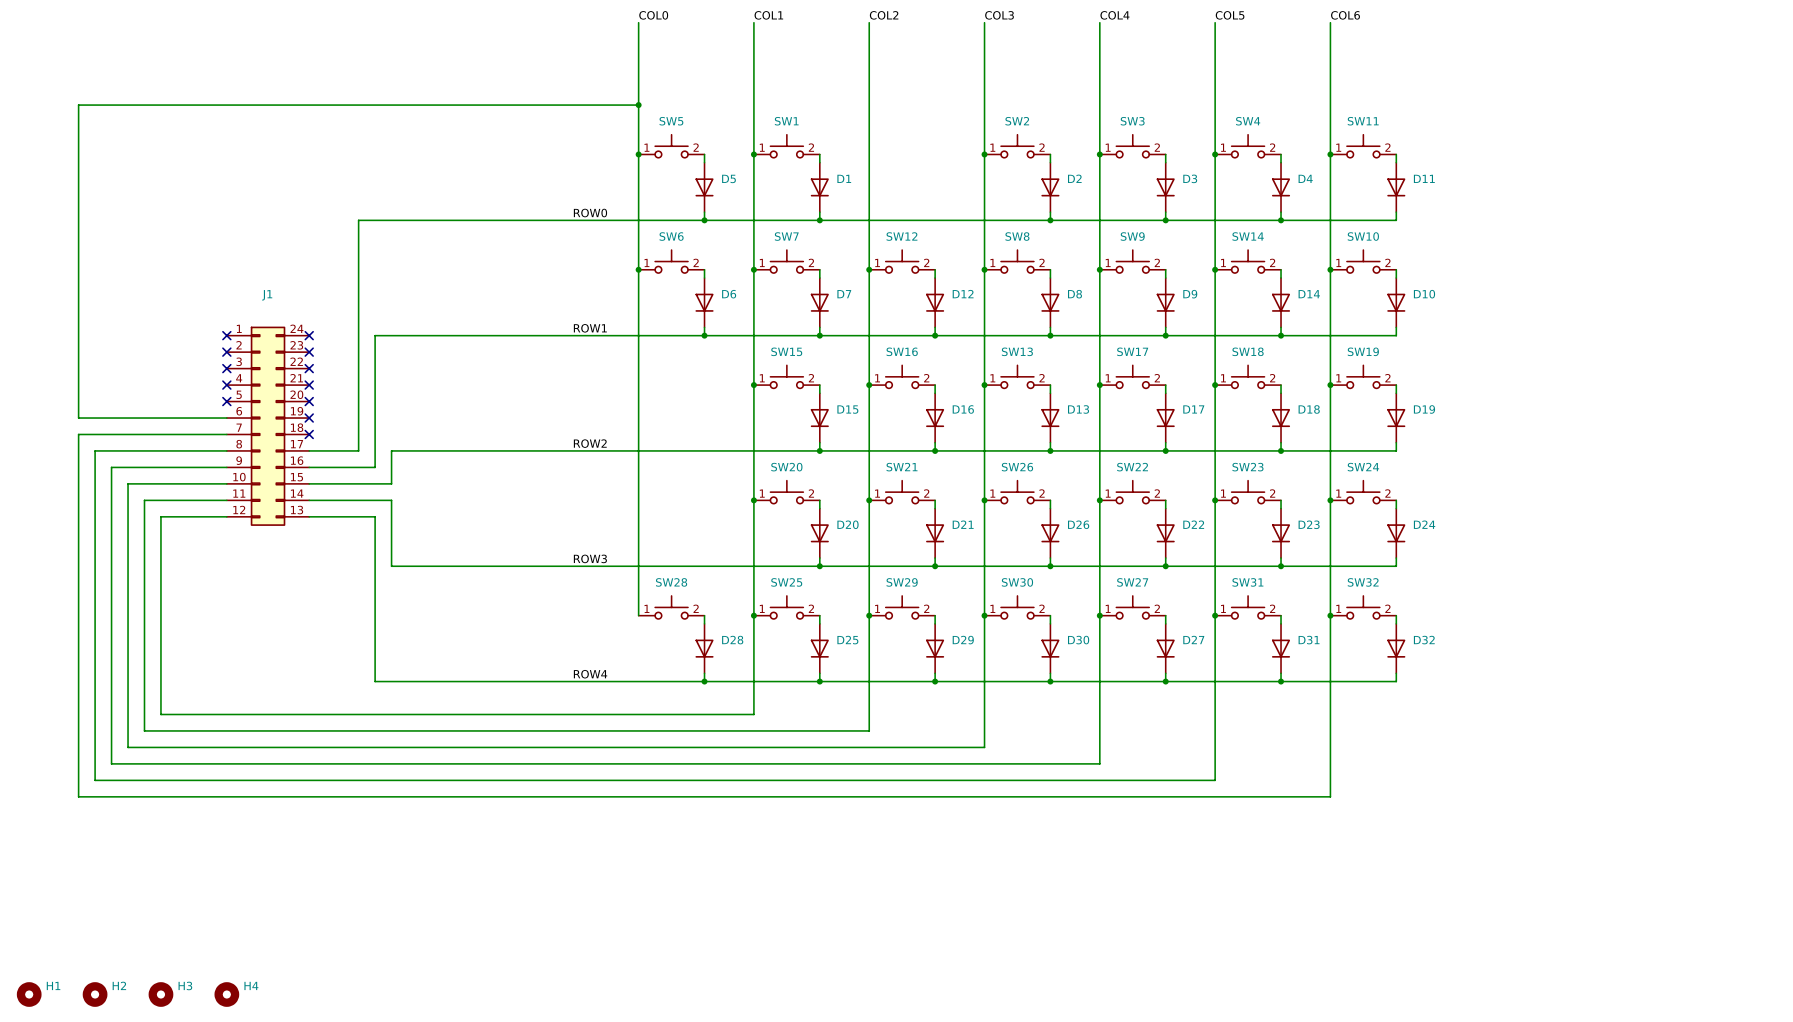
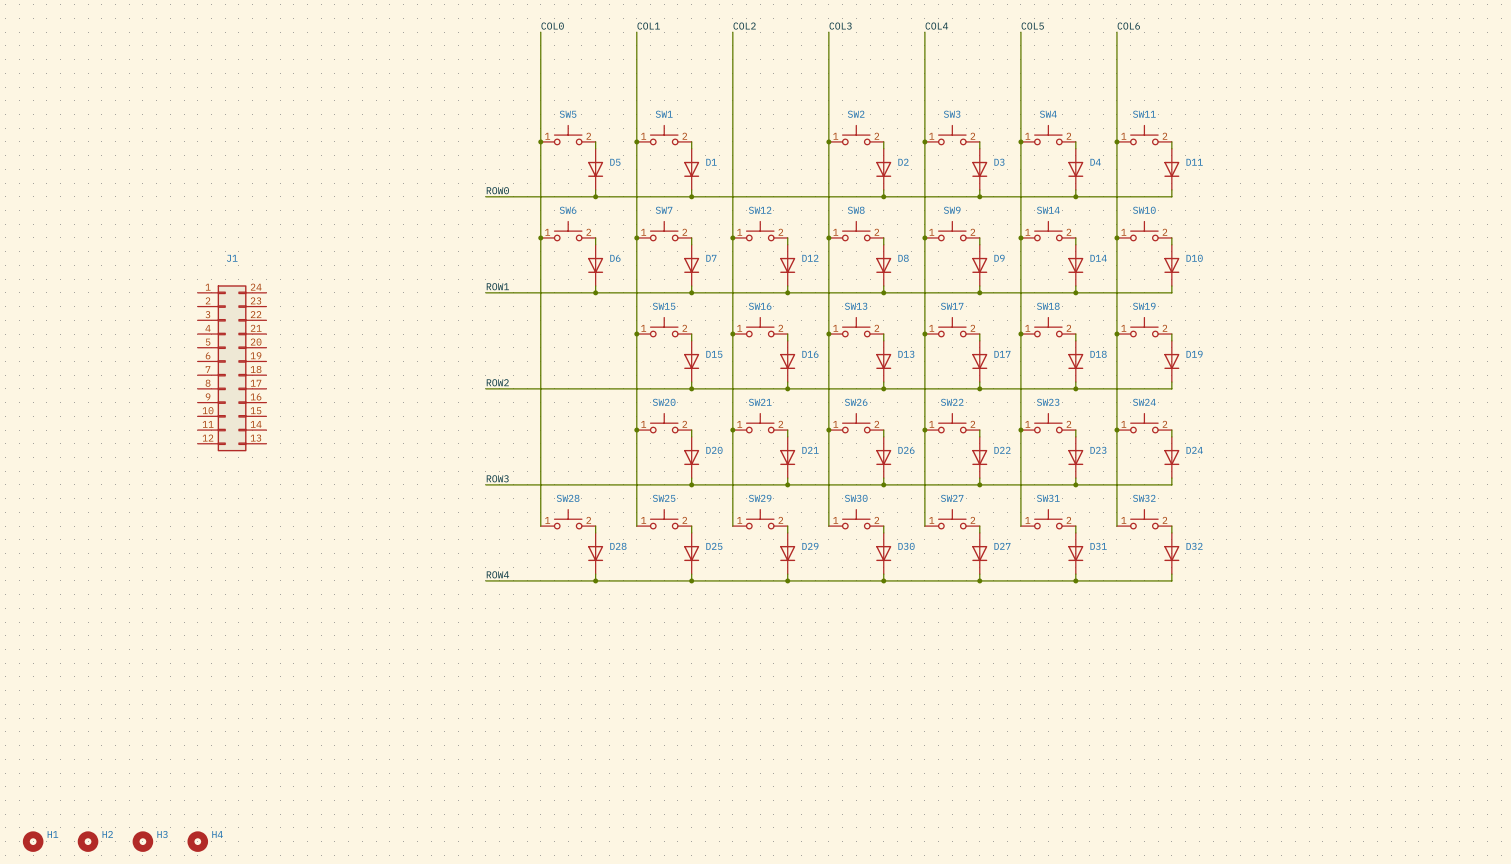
wire: (638, 105) (78, 105) (78, 418) (226, 418) -> none
junction: (638, 105) -> none
wire: (572, 220) (358, 220) (358, 450) (309, 450) -> none
no-connect mark: (226, 335) -> none
no-connect mark: (309, 335) -> none
wire: (572, 335) (375, 335) (375, 467) (309, 467) -> none
no-connect mark: (226, 352) -> none
no-connect mark: (309, 352) -> none
no-connect mark: (226, 368) -> none
no-connect mark: (309, 368) -> none
no-connect mark: (226, 385) -> none
no-connect mark: (309, 385) -> none
no-connect mark: (226, 401) -> none
no-connect mark: (309, 401) -> none
no-connect mark: (309, 418) -> none
wire: (226, 434) (78, 434) (78, 796) (1330, 796) (1330, 615) -> none
no-connect mark: (309, 434) -> none
wire: (226, 450) (95, 450) (95, 780) (1215, 780) (1215, 615) -> none
wire: (572, 450) (391, 450) (391, 483) (309, 483) -> none
wire: (226, 467) (111, 467) (111, 763) (1099, 763) (1099, 615) -> none
wire: (226, 483) (128, 483) (128, 747) (984, 747) (984, 615) -> none
wire: (226, 500) (144, 500) (144, 730) (869, 730) (869, 615) -> none
wire: (309, 500) (391, 500) (391, 566) (572, 566) -> none
wire: (226, 516) (160, 516) (160, 714) (753, 714) (753, 615) -> none
wire: (309, 516) (375, 516) (375, 681) (572, 681) -> none
junction: (753, 615) -> none
junction: (869, 615) -> none
junction: (984, 615) -> none
junction: (1099, 615) -> none
junction: (1215, 615) -> none
junction: (1330, 615) -> none

